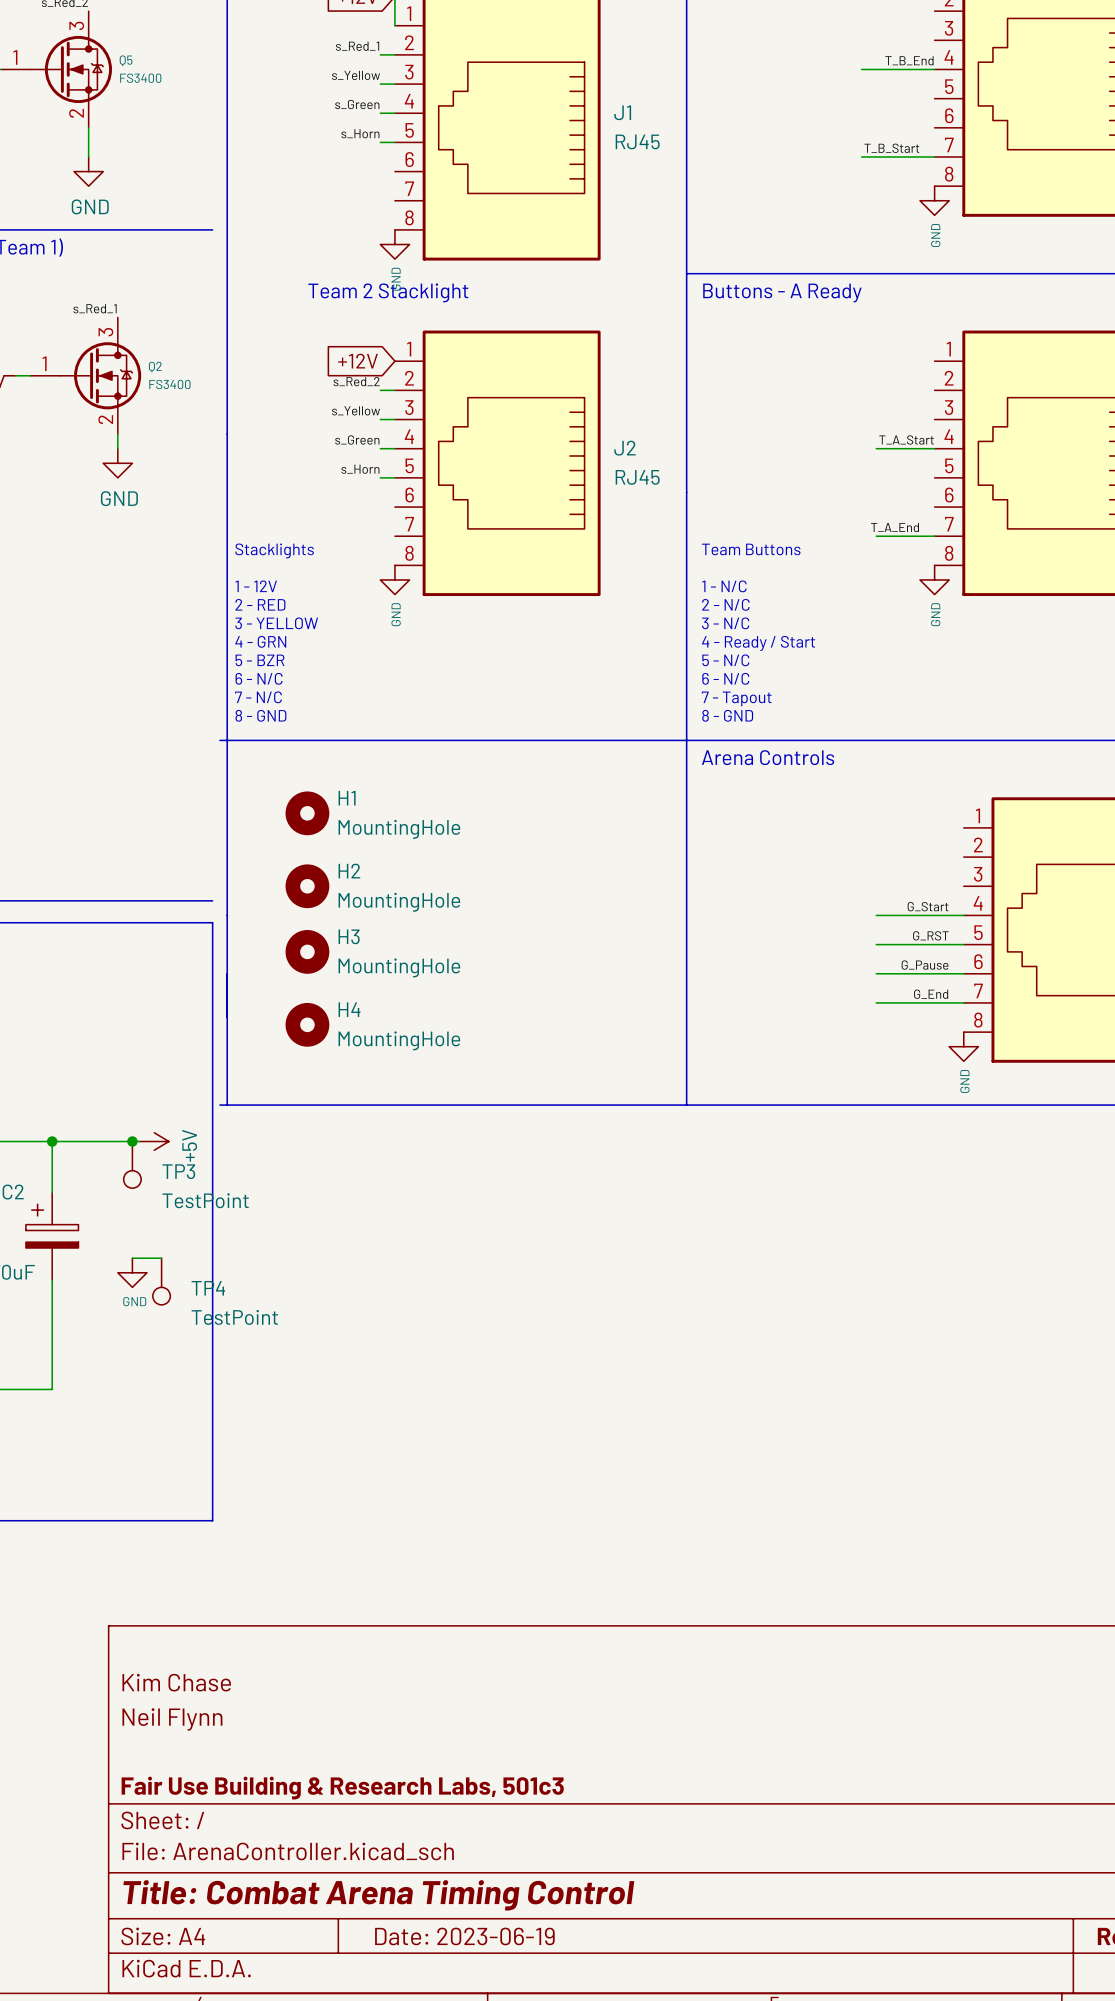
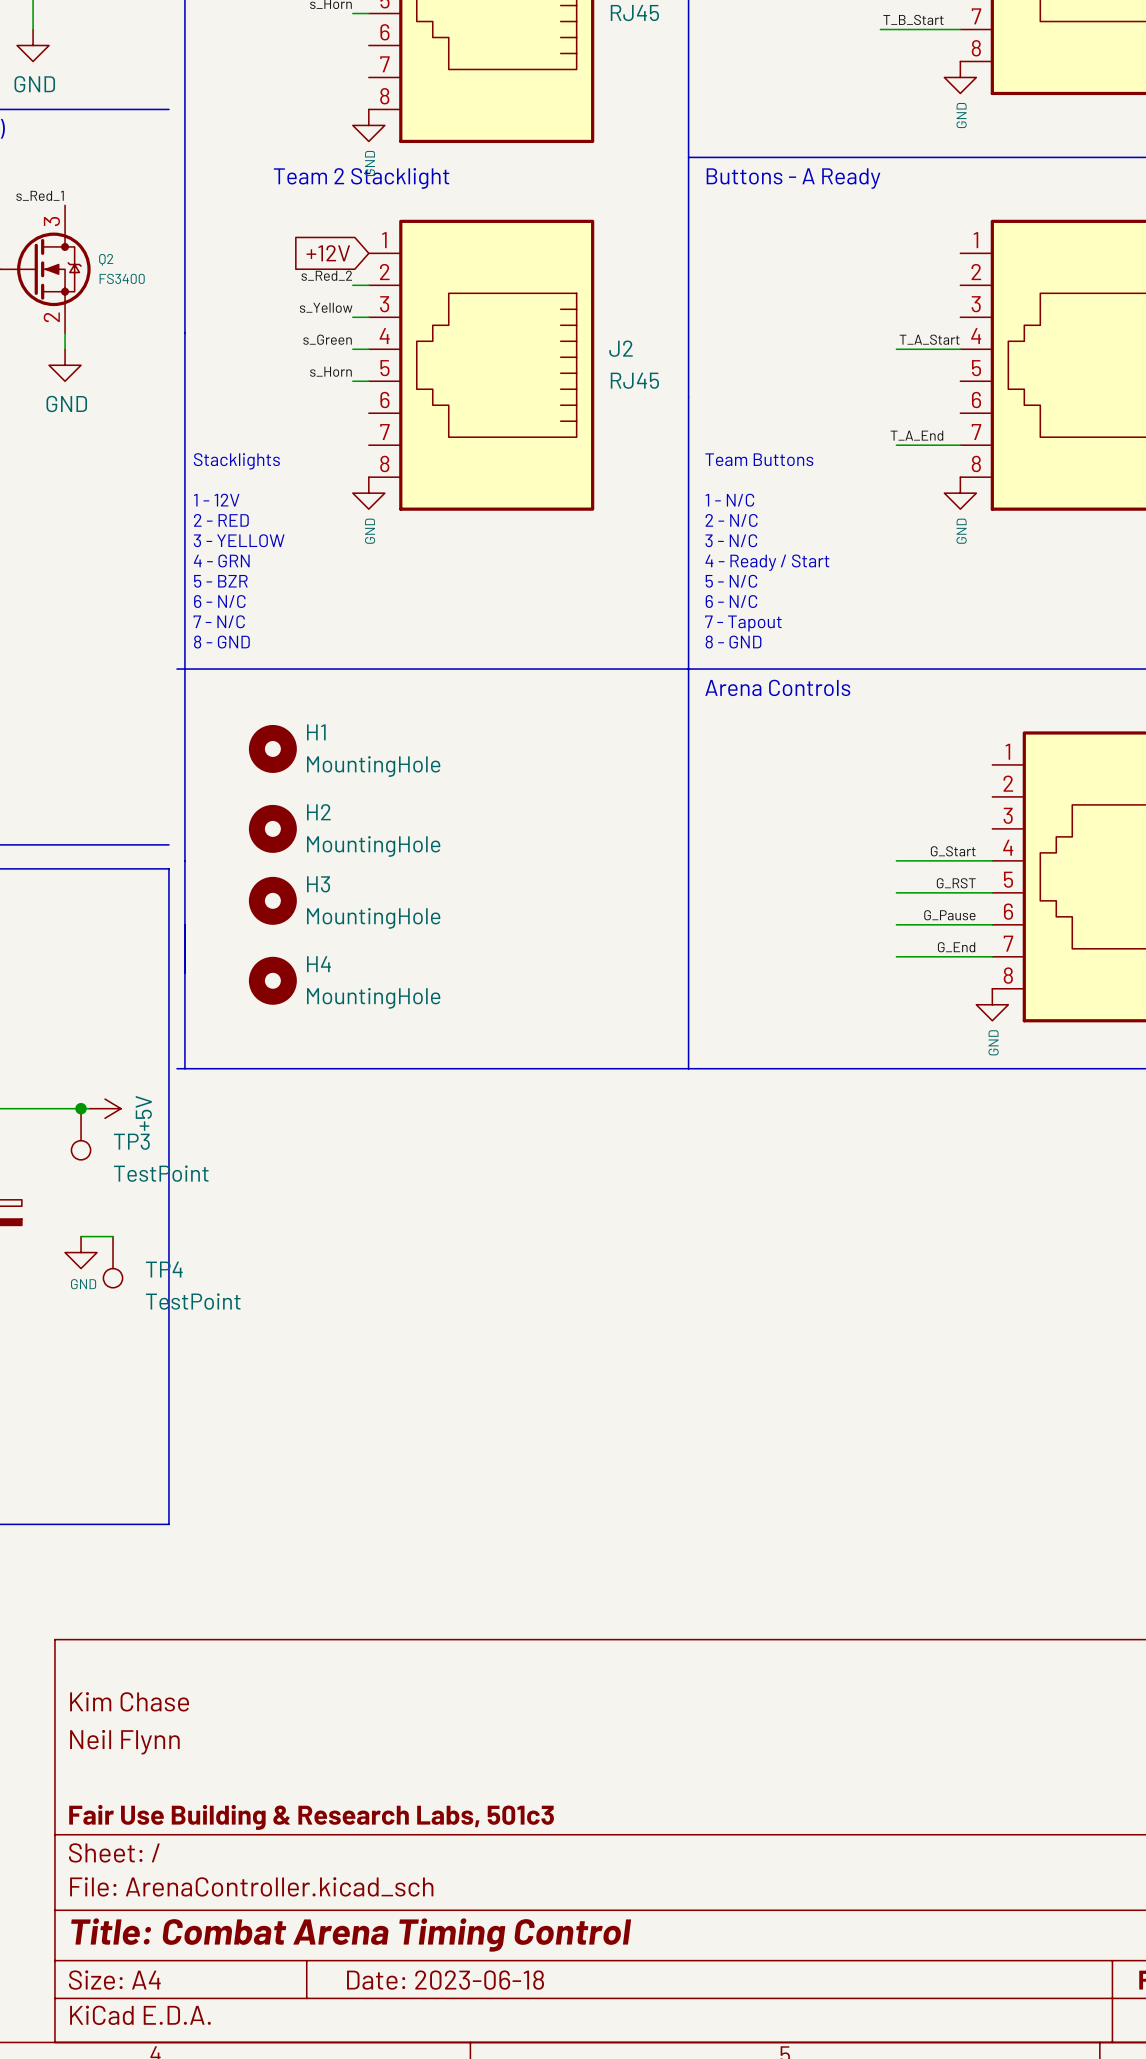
title block: Date: 2023-06-19 (464, 1936) -> Date: 2023-06-18 (445, 1980)

